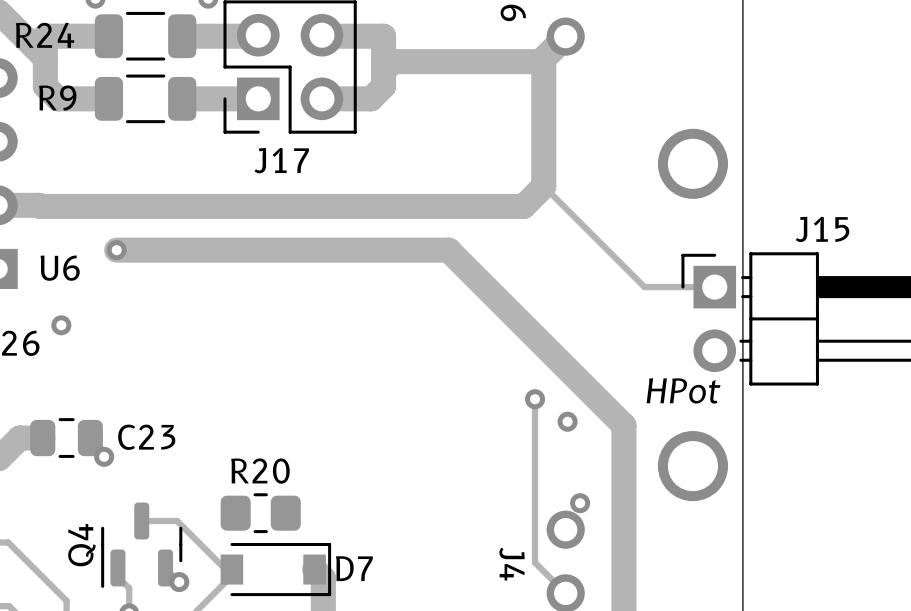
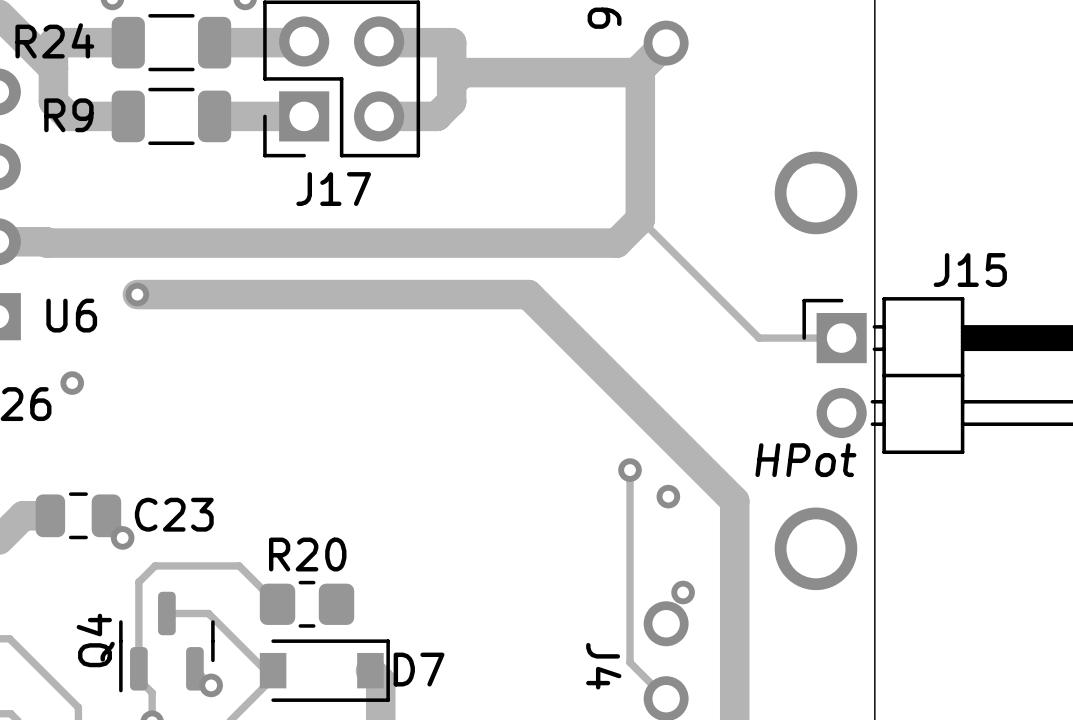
track: none -> (277, 604) (239, 565) (155, 565) (138, 582) (138, 668)

